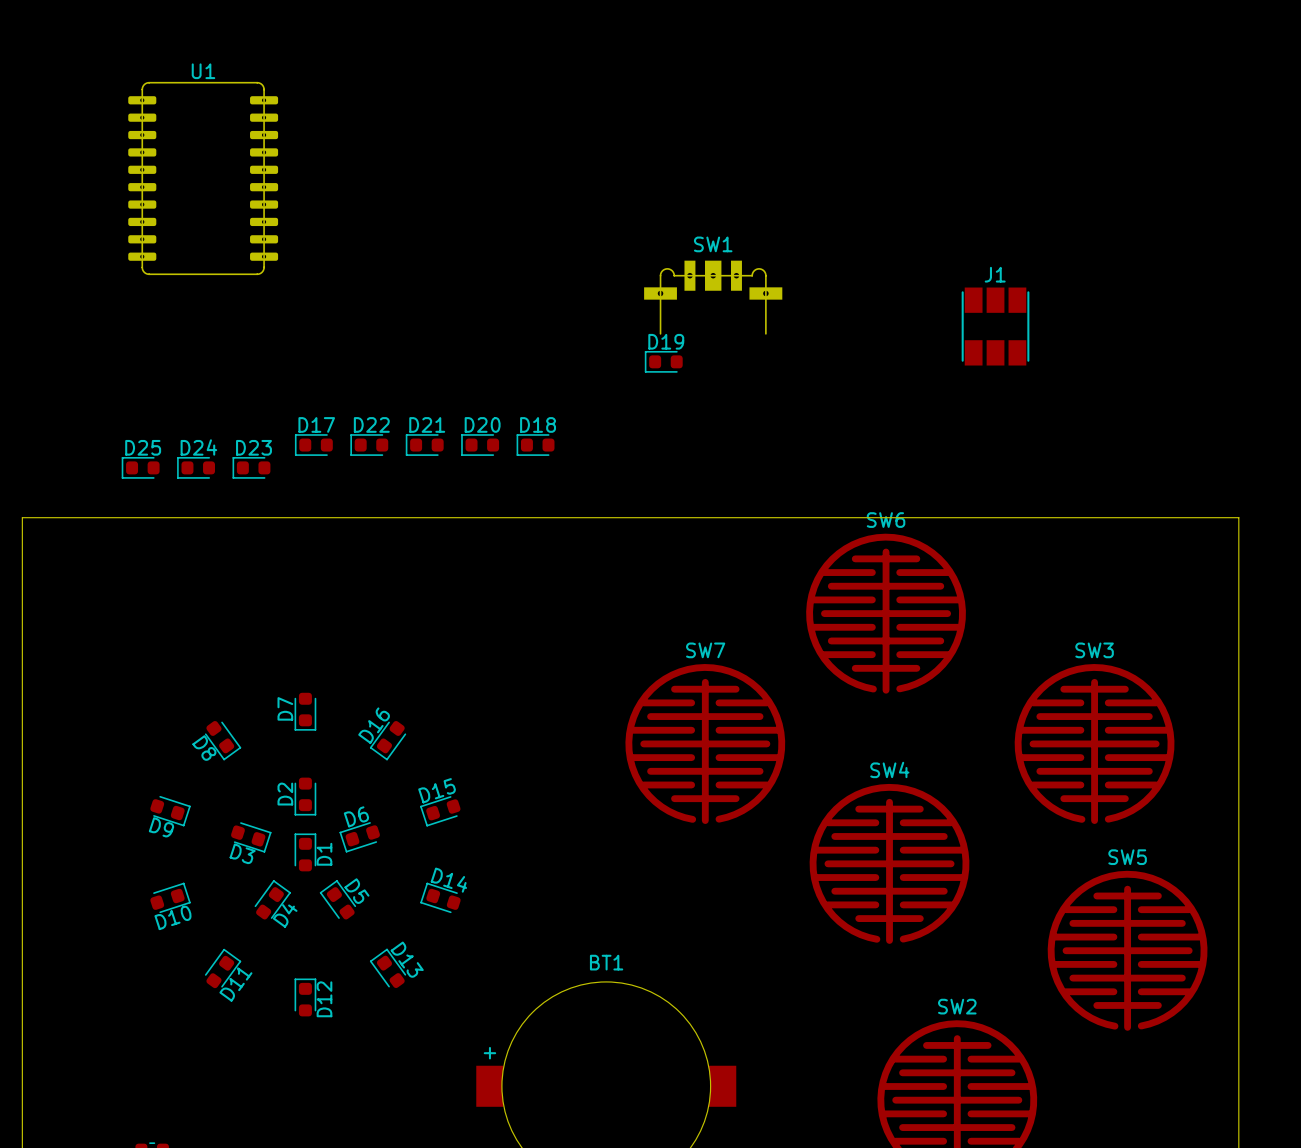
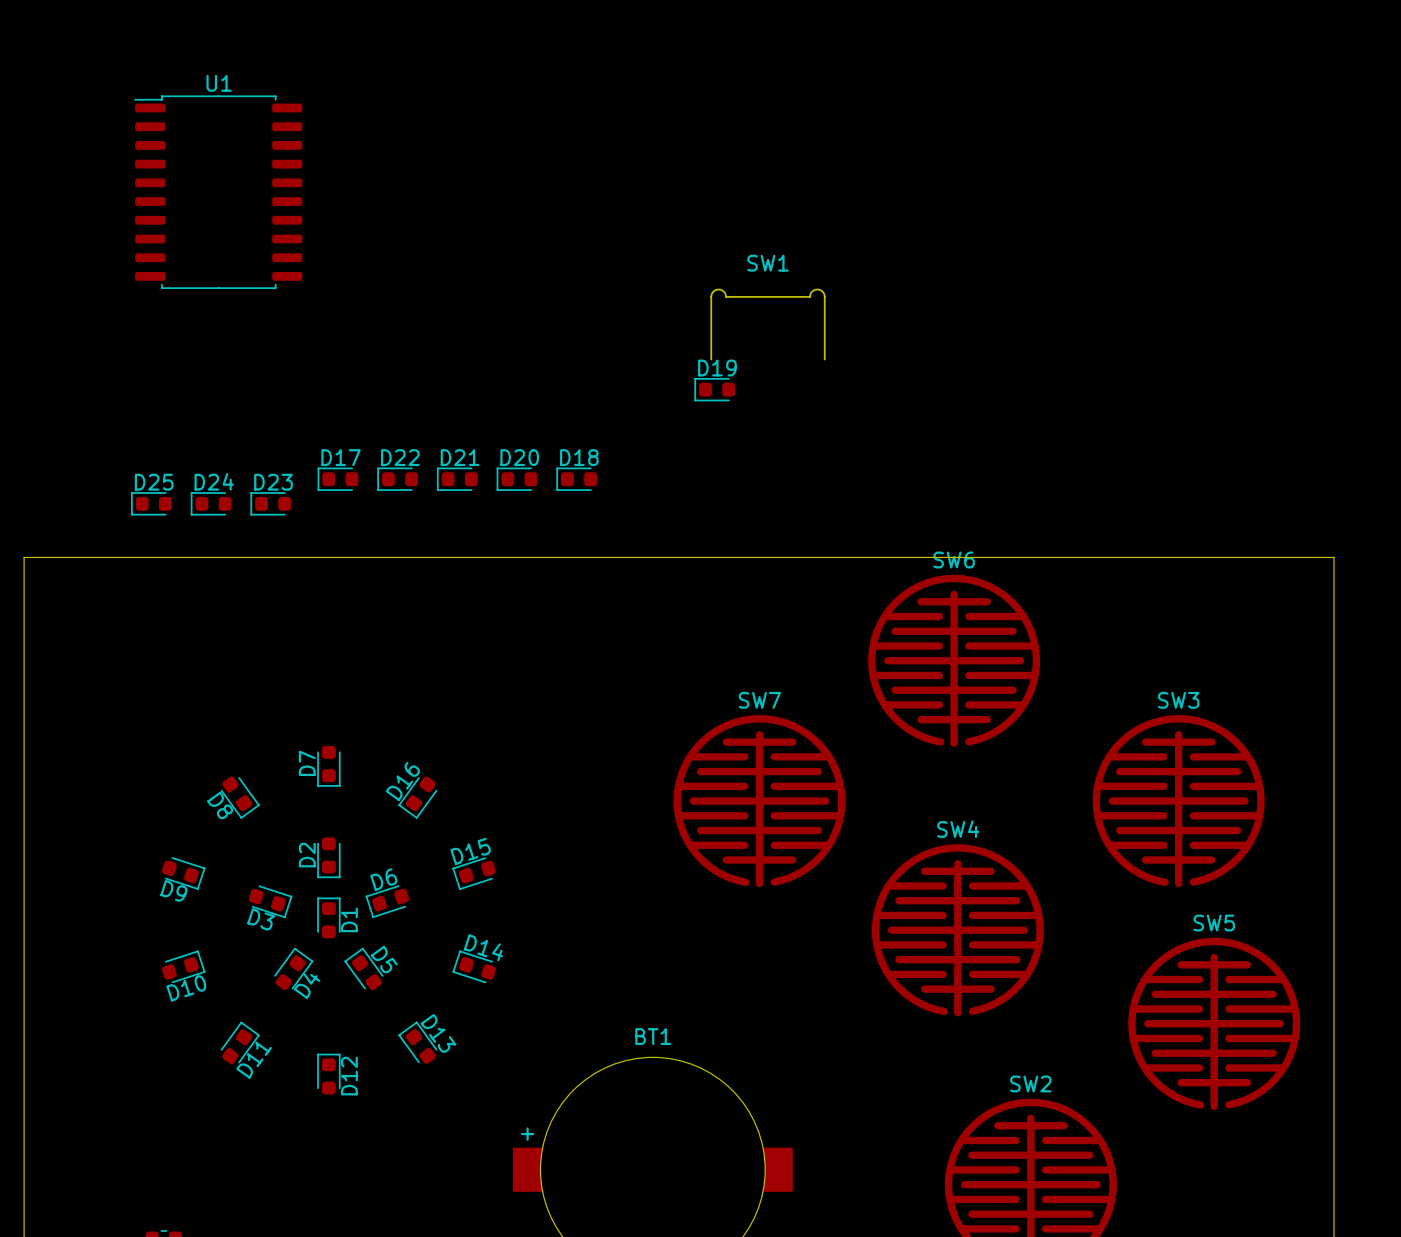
U1 footprint: [128, 81, 279, 276] -> [134, 95, 303, 290]
SW1 footprint: [644, 260, 783, 335] -> [710, 288, 826, 361]
J1: (995, 326) -> none

